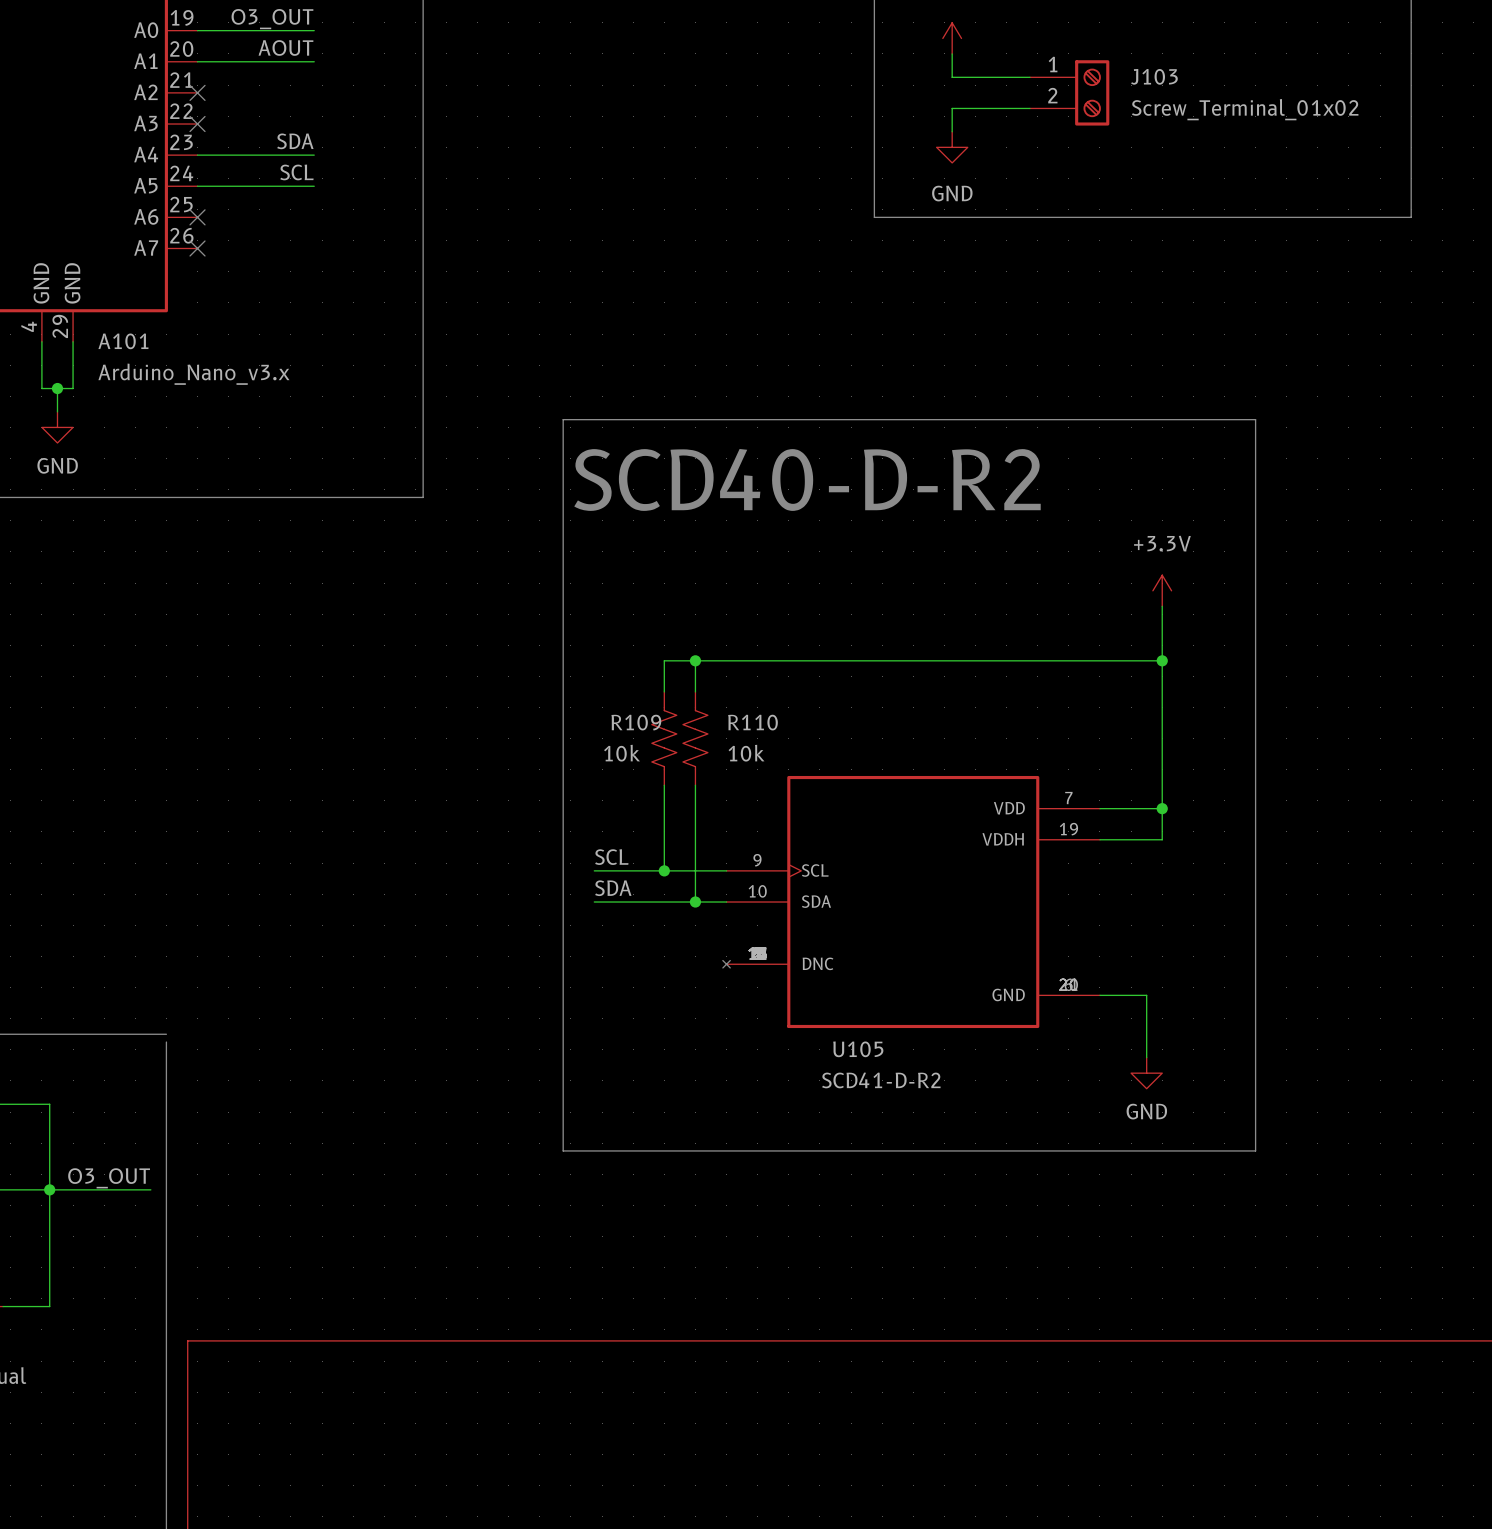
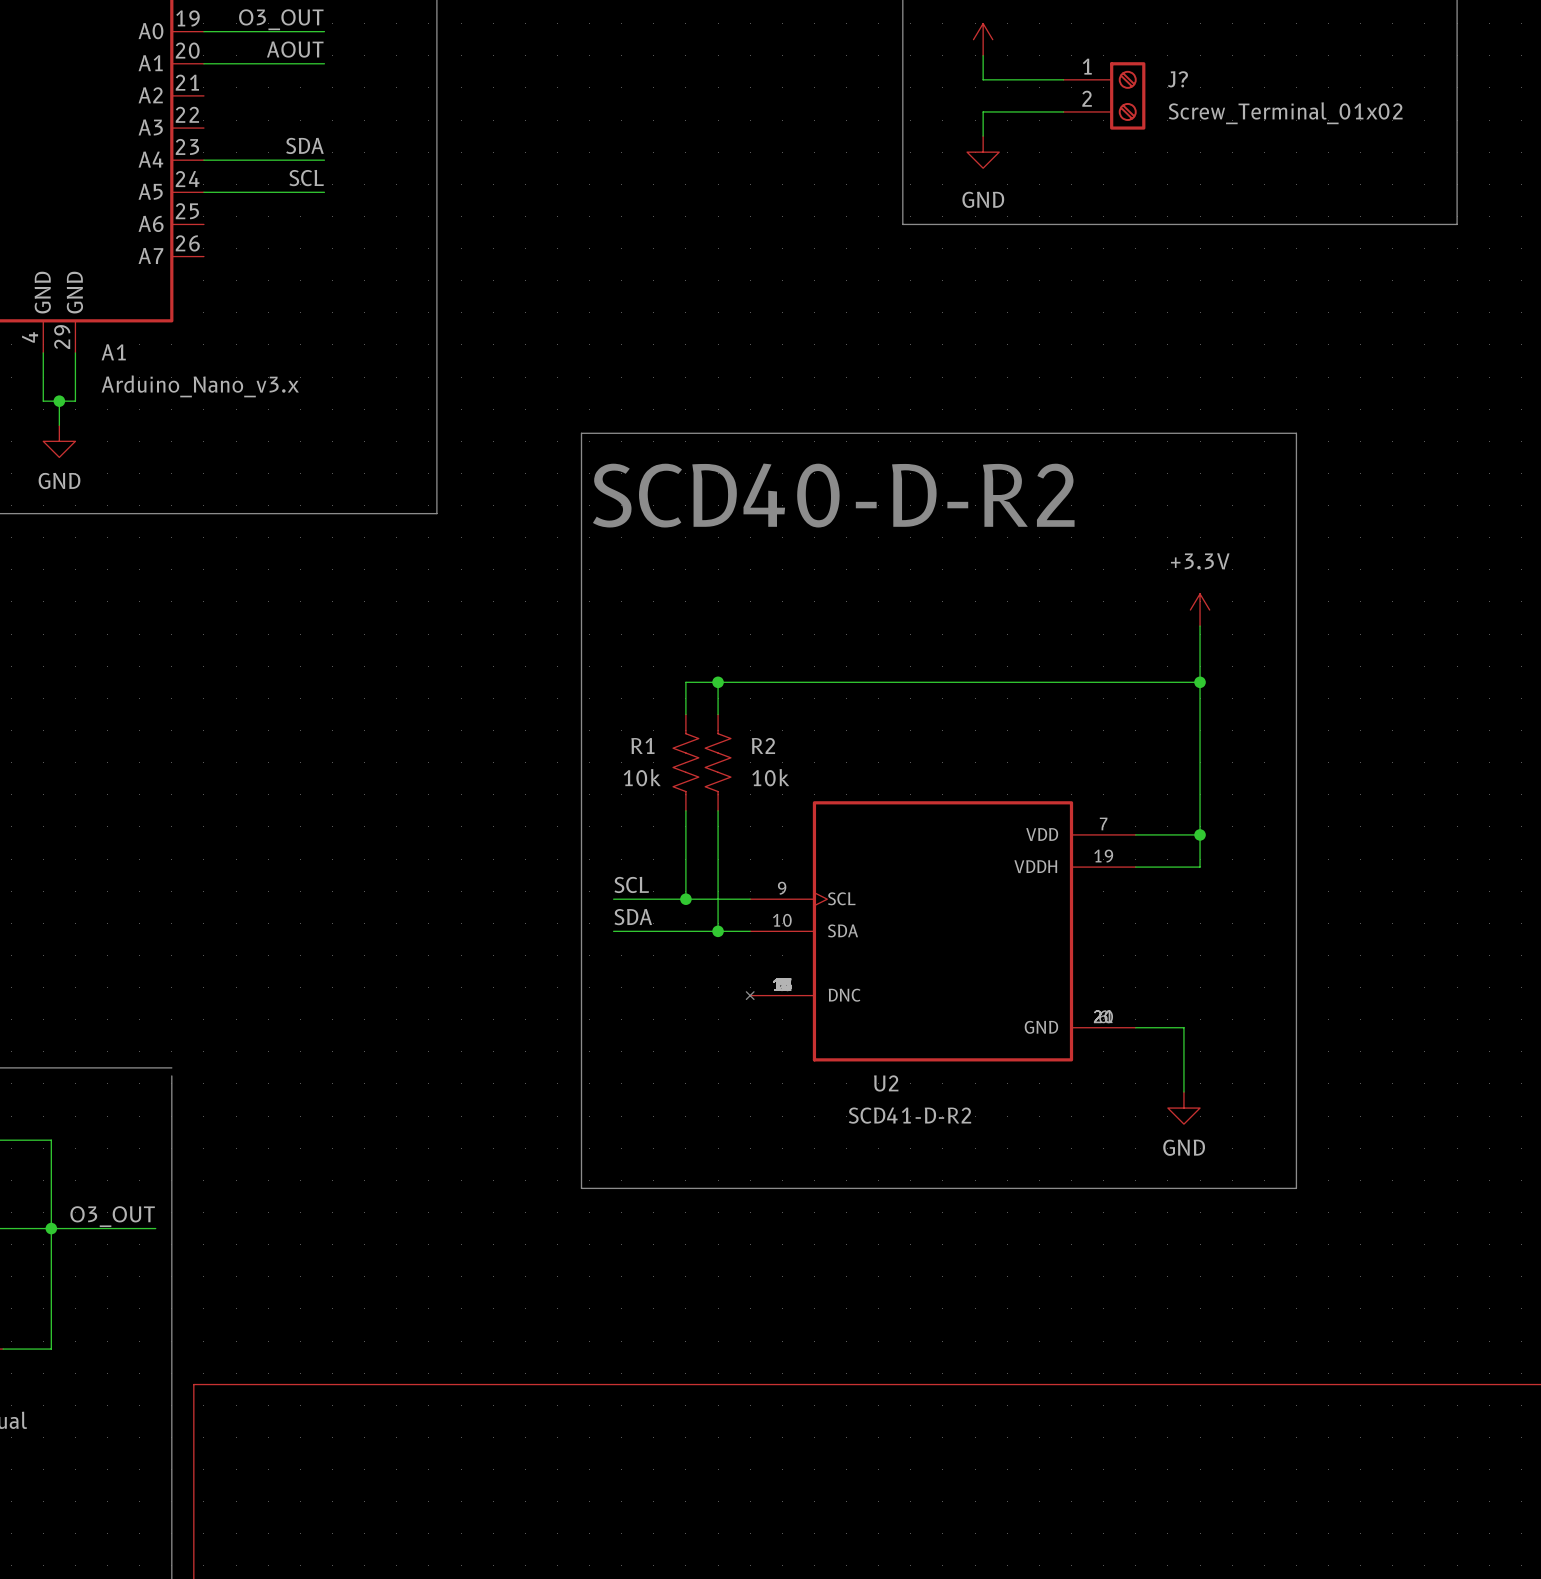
J103 name: J103 (1154, 76) -> J? (1177, 79)
no-connect mark: (197, 92) -> none
no-connect mark: (197, 124) -> none
no-connect mark: (197, 217) -> none
no-connect mark: (197, 248) -> none
A101 name: A101 (123, 341) -> A1 (113, 352)
R109 name: R109 (636, 722) -> R1 (642, 745)
R110 name: R110 (752, 722) -> R2 (763, 745)
U105 name: U105 (858, 1049) -> U2 (886, 1083)

